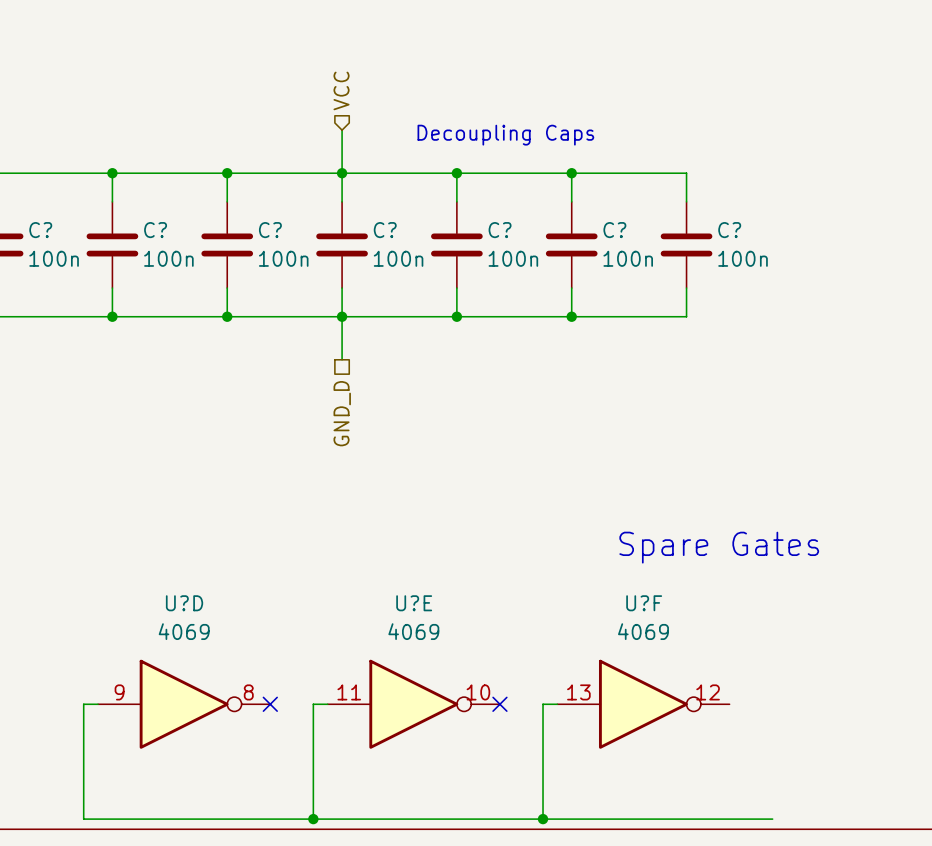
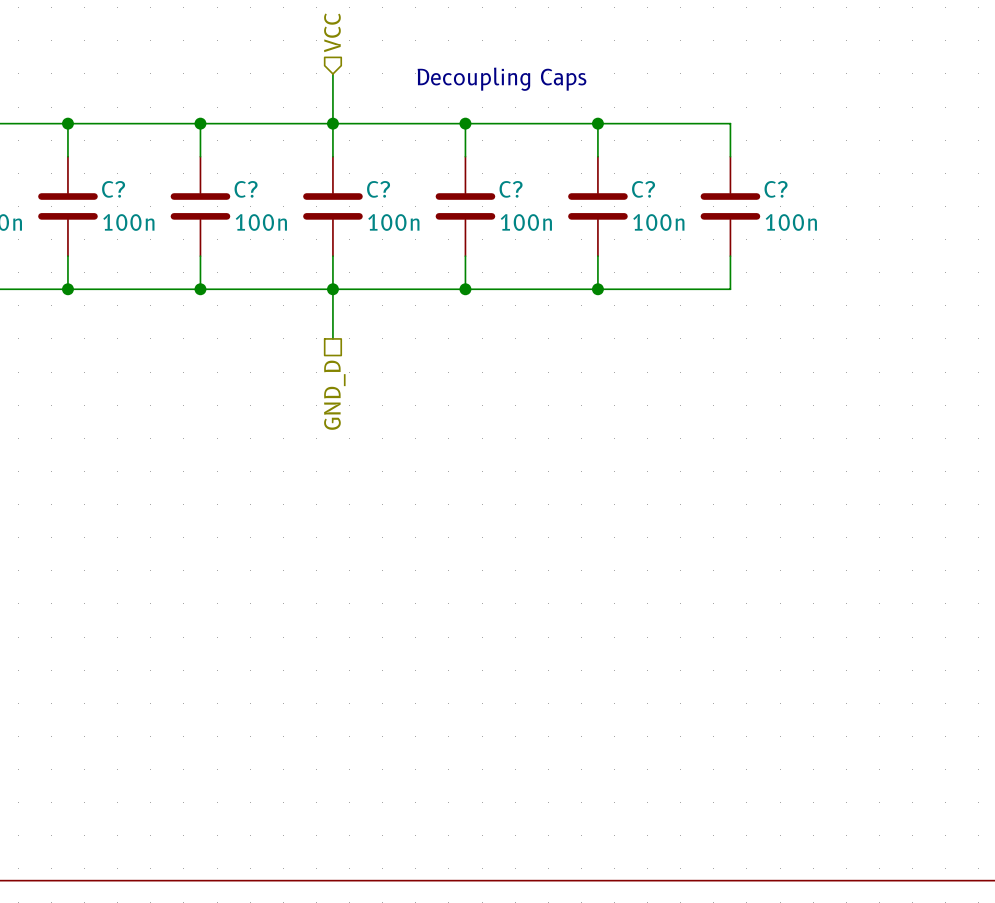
text: Spare Gates (719, 547) -> none
wire: (98, 704) (83, 704) (83, 819) (772, 819) -> none
U?D: 4069 (184, 704) -> none
no-connect mark: (270, 704) -> none
wire: (327, 704) (313, 704) (313, 819) -> none
U?E: 4069 (413, 704) -> none
no-connect mark: (499, 704) -> none
wire: (557, 704) (543, 704) (543, 819) -> none
U?F: 4069 (643, 704) -> none
junction: (313, 819) -> none
junction: (543, 819) -> none

